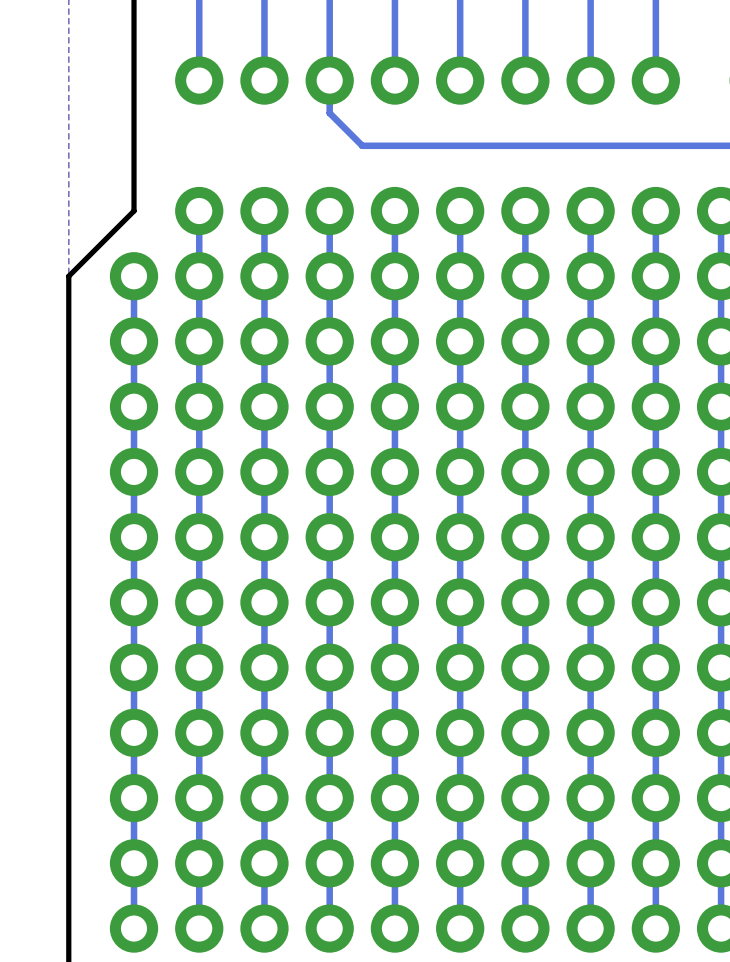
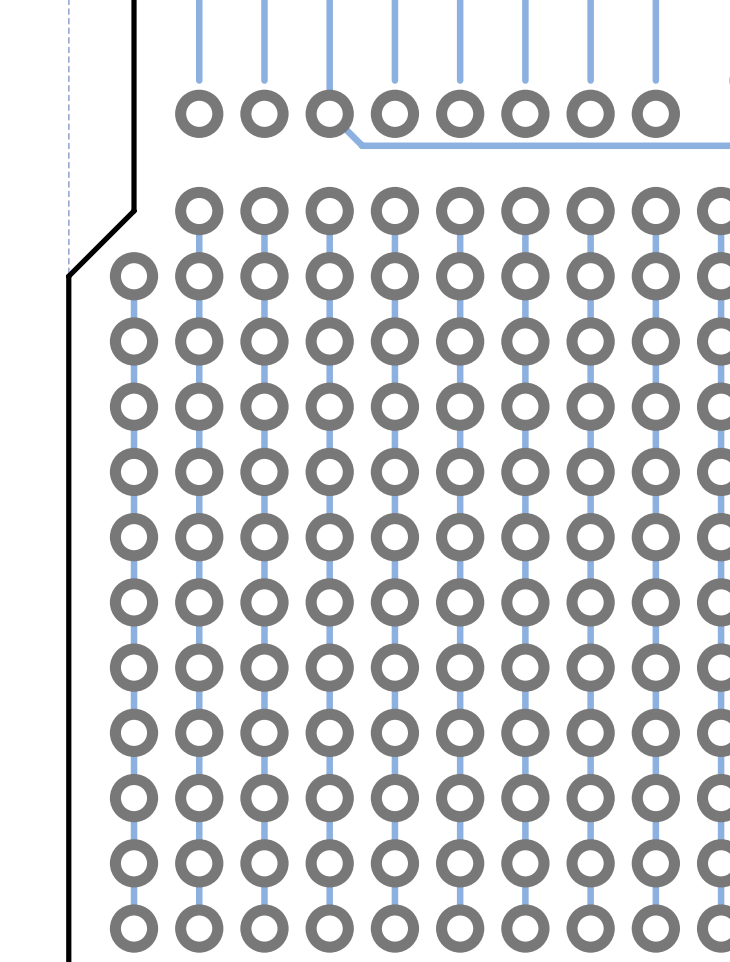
via position: (199, 80) -> (199, 113)
via position: (264, 80) -> (264, 113)
via position: (329, 80) -> (329, 113)
via position: (394, 80) -> (394, 113)
via position: (460, 80) -> (460, 113)
via position: (525, 80) -> (525, 113)
via position: (590, 80) -> (590, 113)
via position: (655, 80) -> (655, 113)

